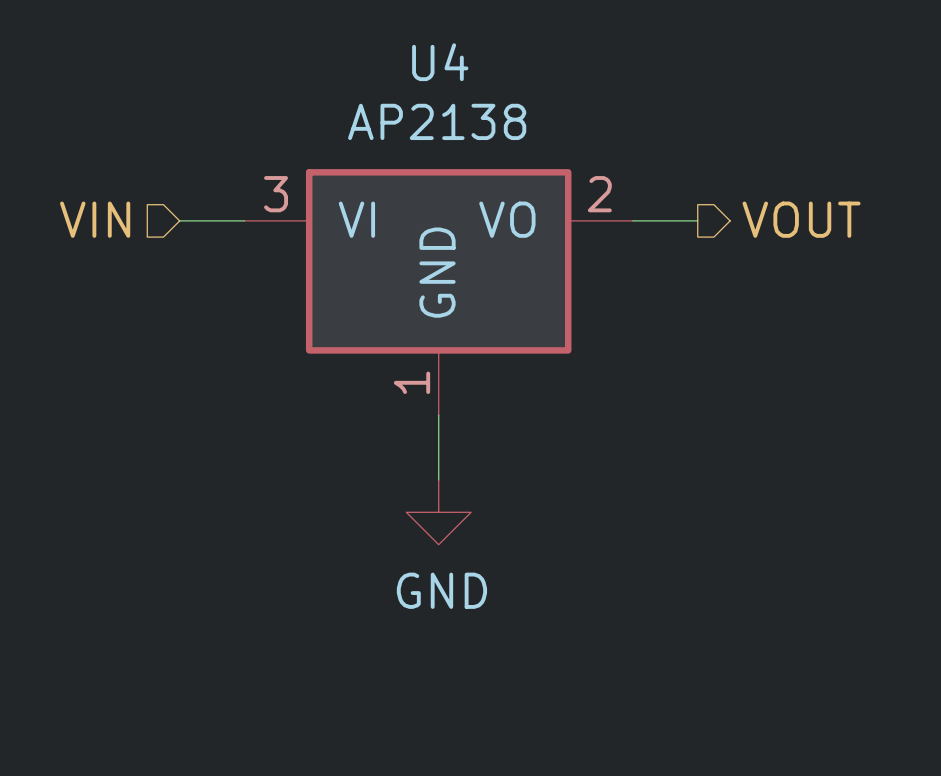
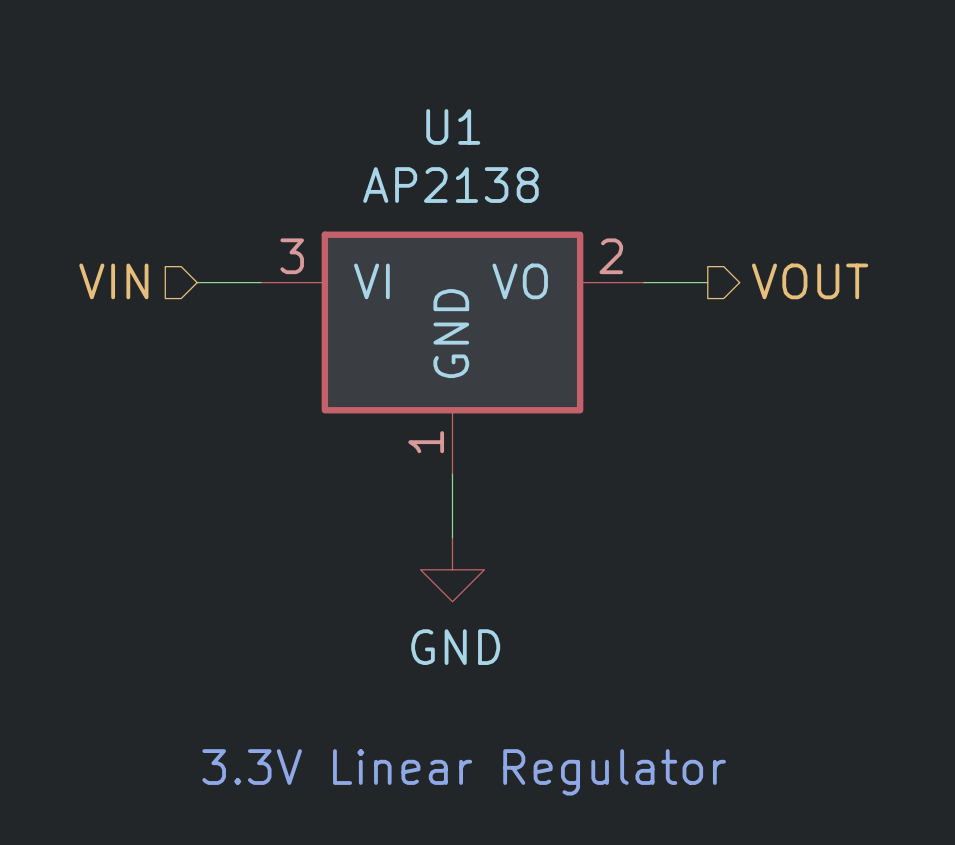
U4 name: U4 (440, 62) -> U1 (453, 126)
text: none -> 3.3V Linear Regulator (464, 772)

